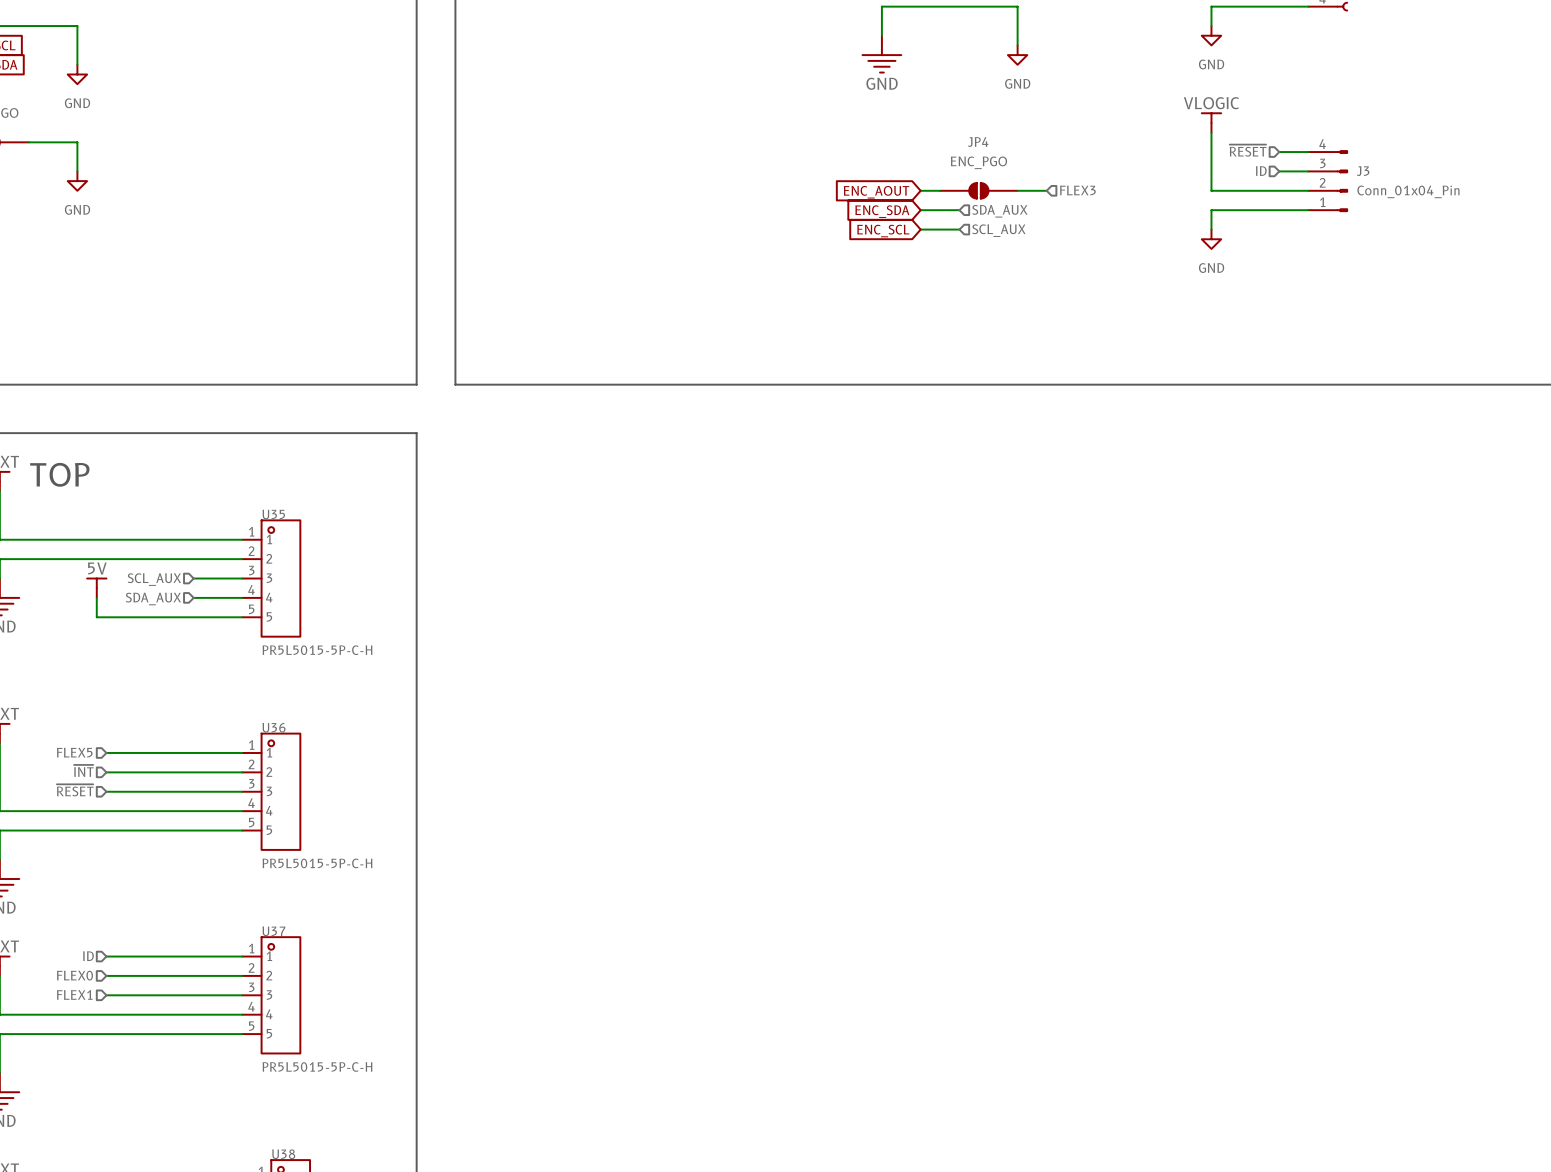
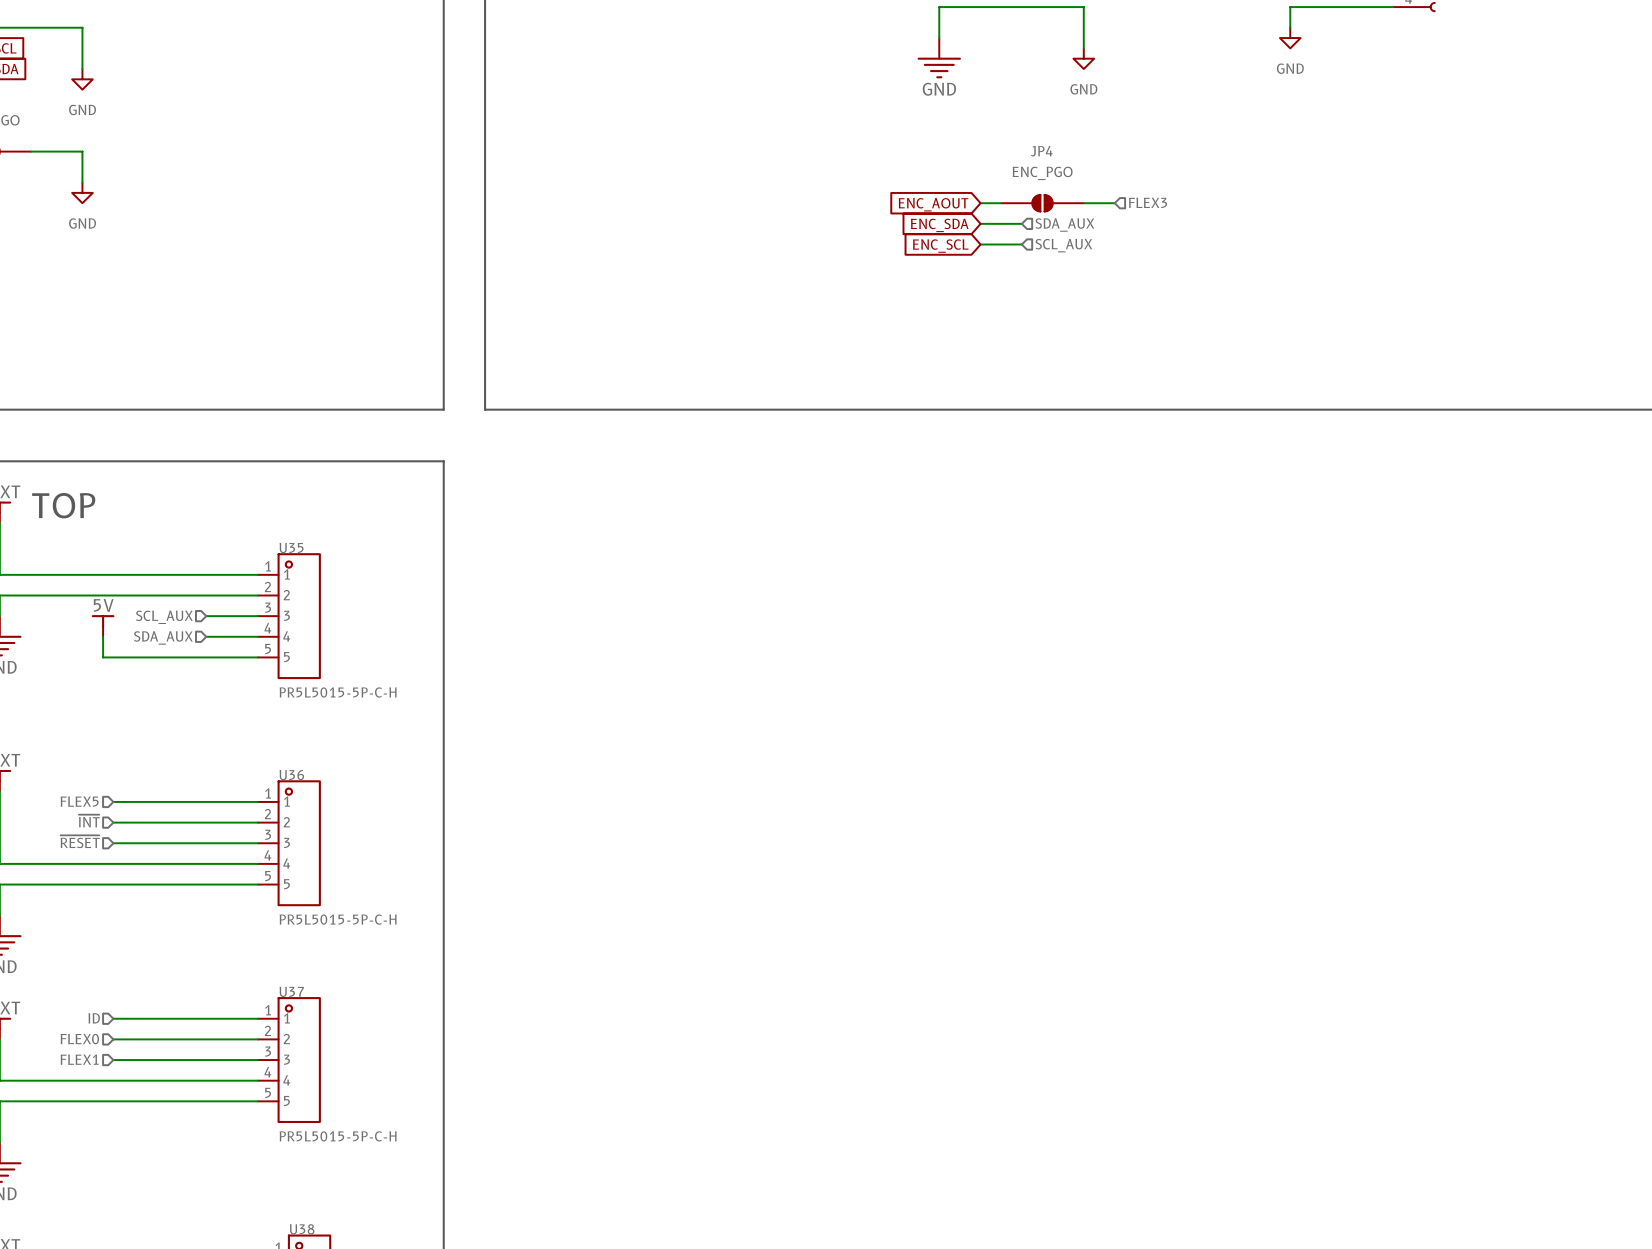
power symbol: VLOGIC (1211, 122) -> none
wire: (1211, 132) (1211, 190) (1308, 190) -> none
hierarchical label: ~{RESET} (1248, 150) -> none
wire: (1279, 152) (1308, 152) -> none
hierarchical label: ID (1261, 171) -> none
wire: (1279, 171) (1308, 171) -> none
J3: Conn_01x04_Pin (1328, 181) -> none
wire: (1308, 210) (1211, 210) (1211, 229) -> none
power symbol: GND (1211, 239) -> none

